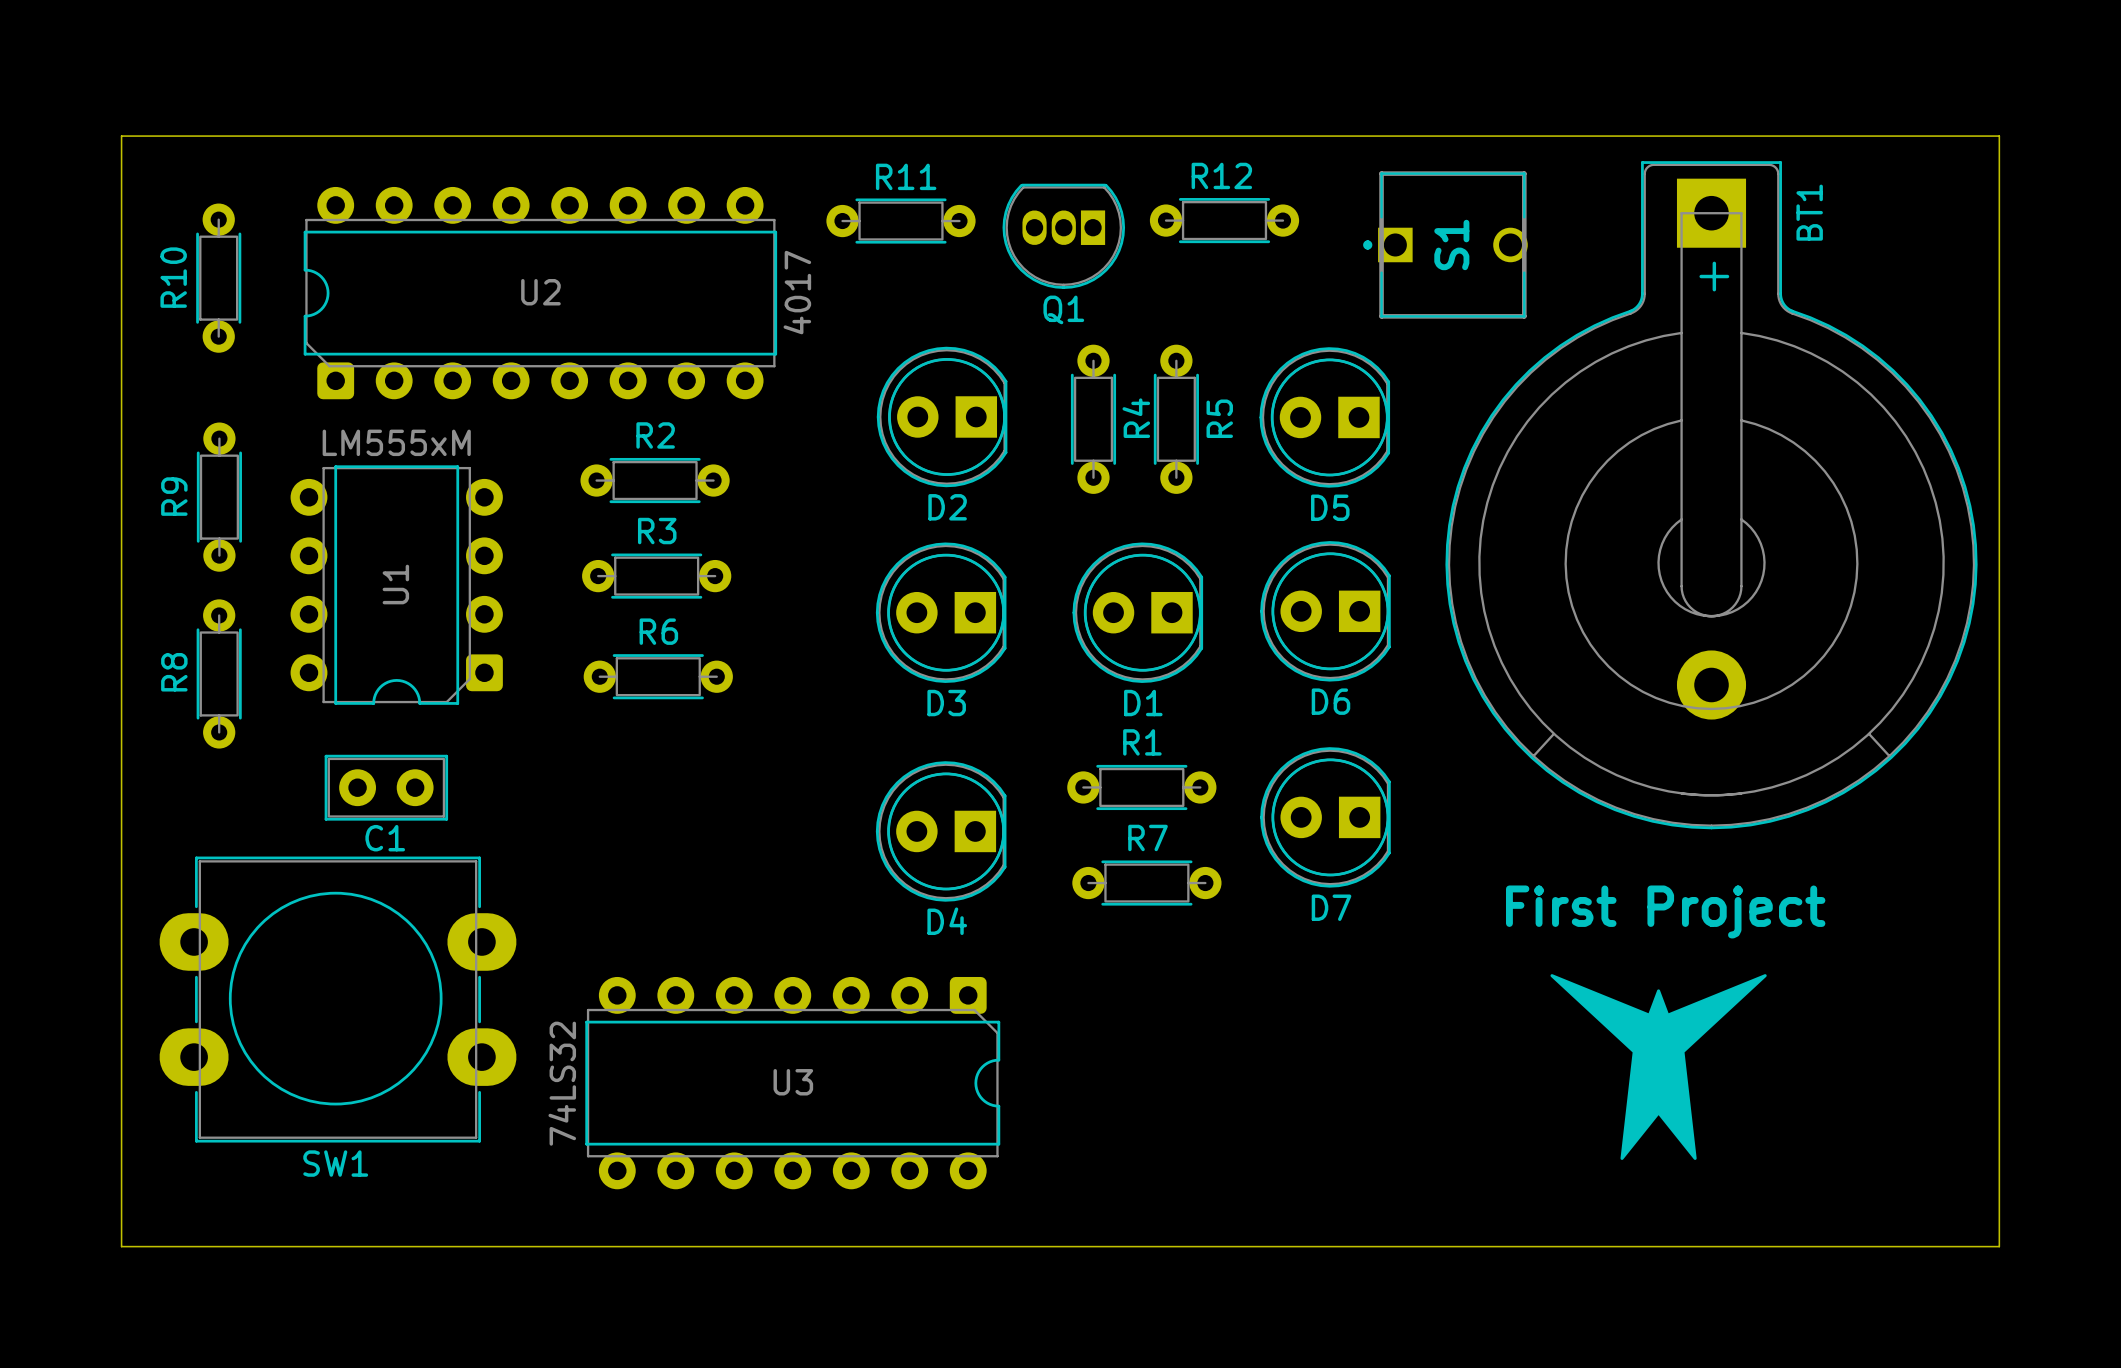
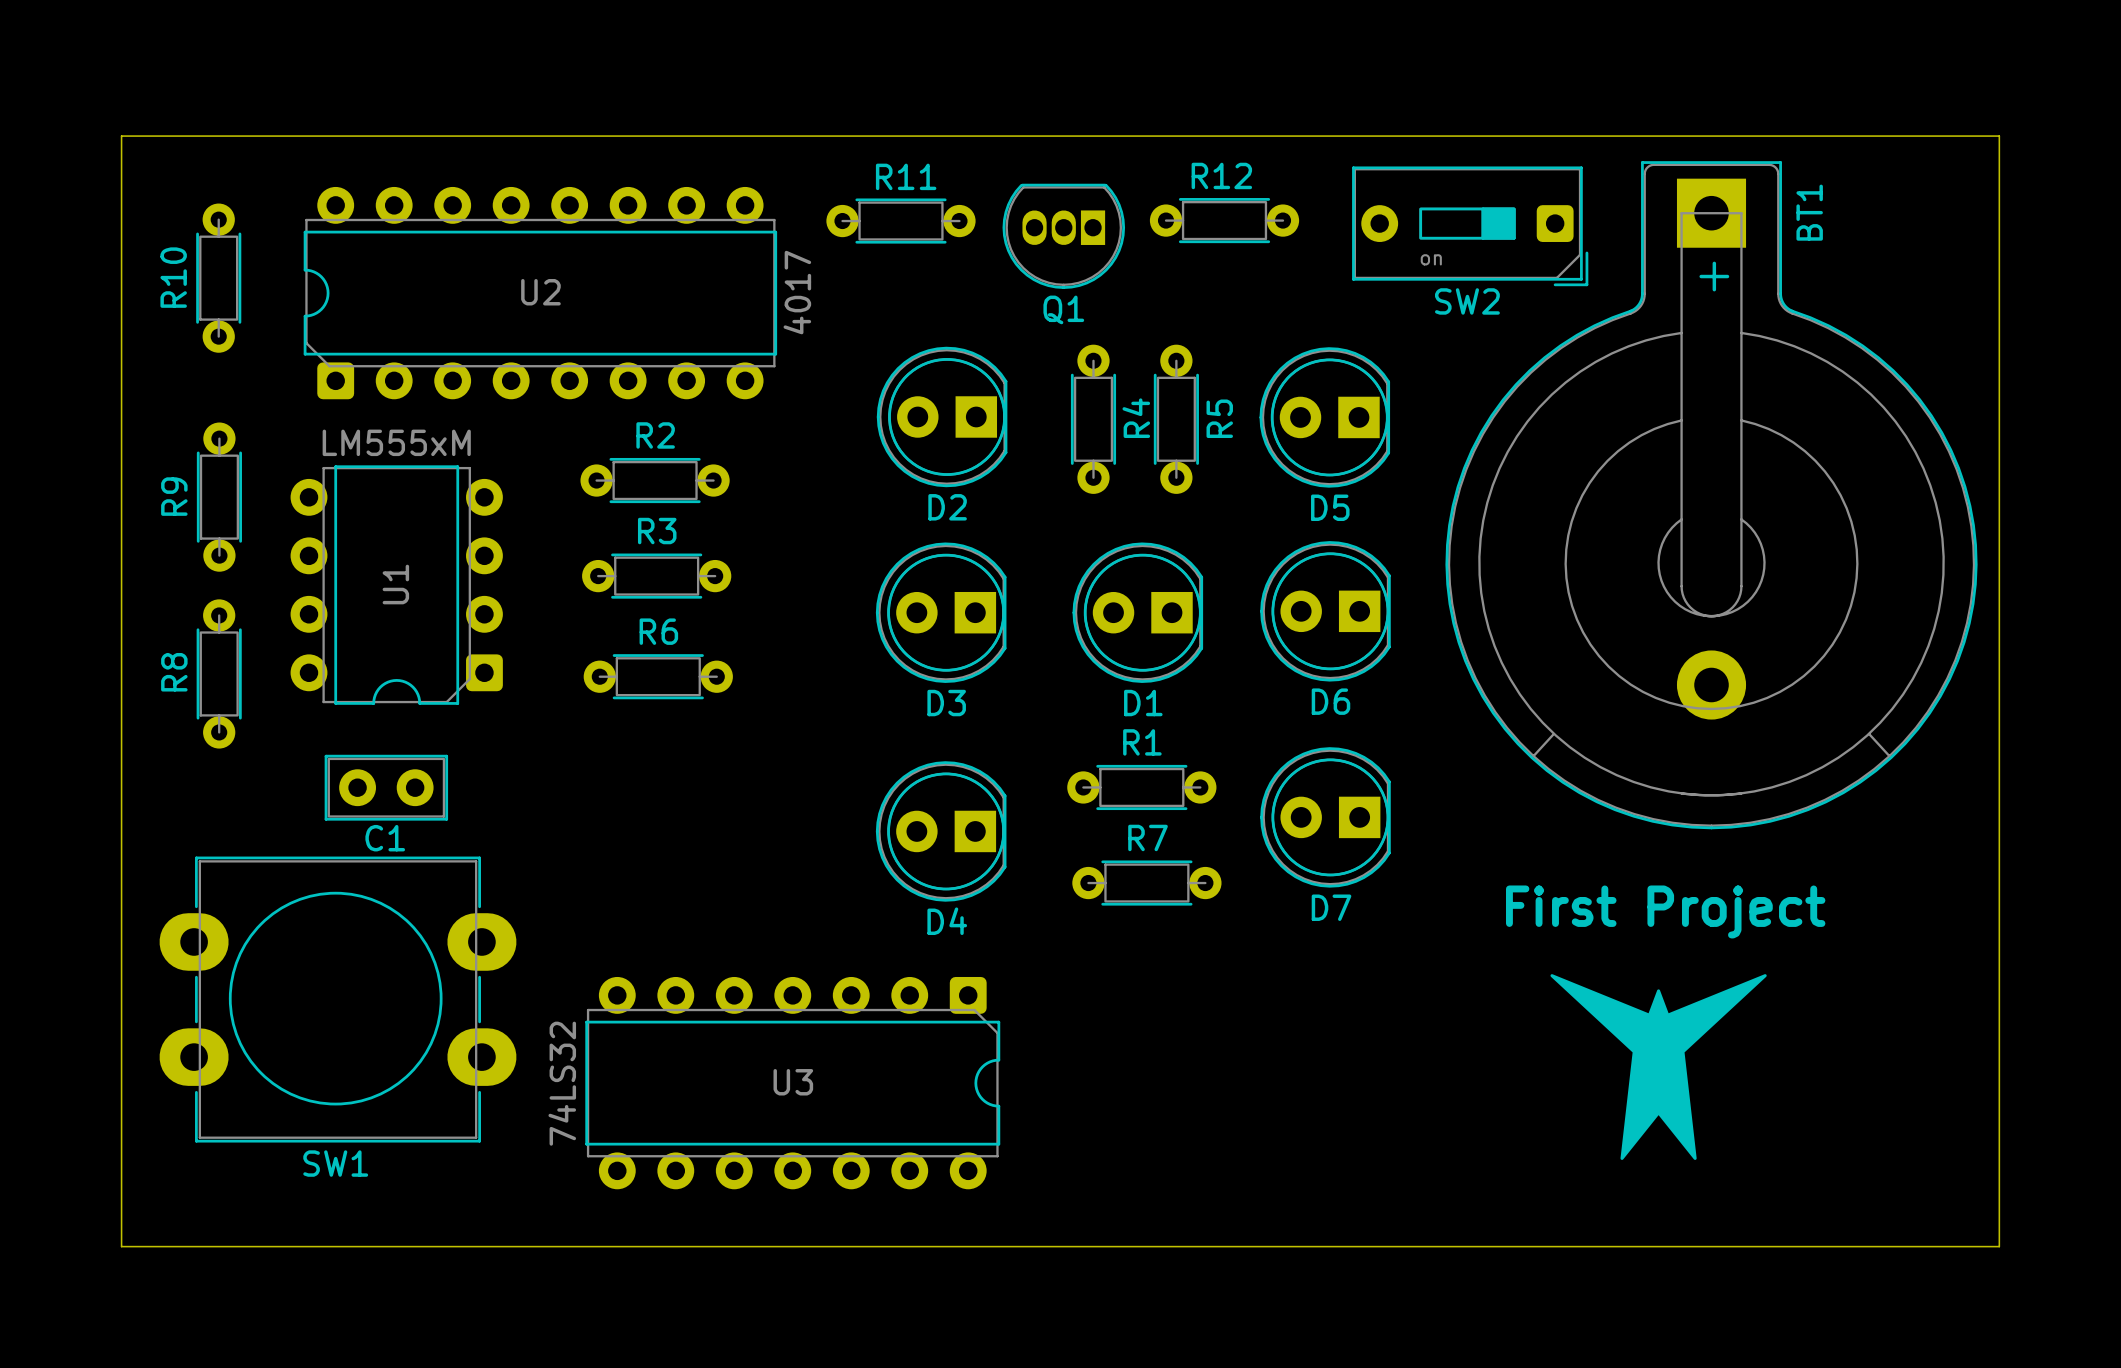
SW2: none -> (1470, 226)
S1: (1445, 244) -> none

